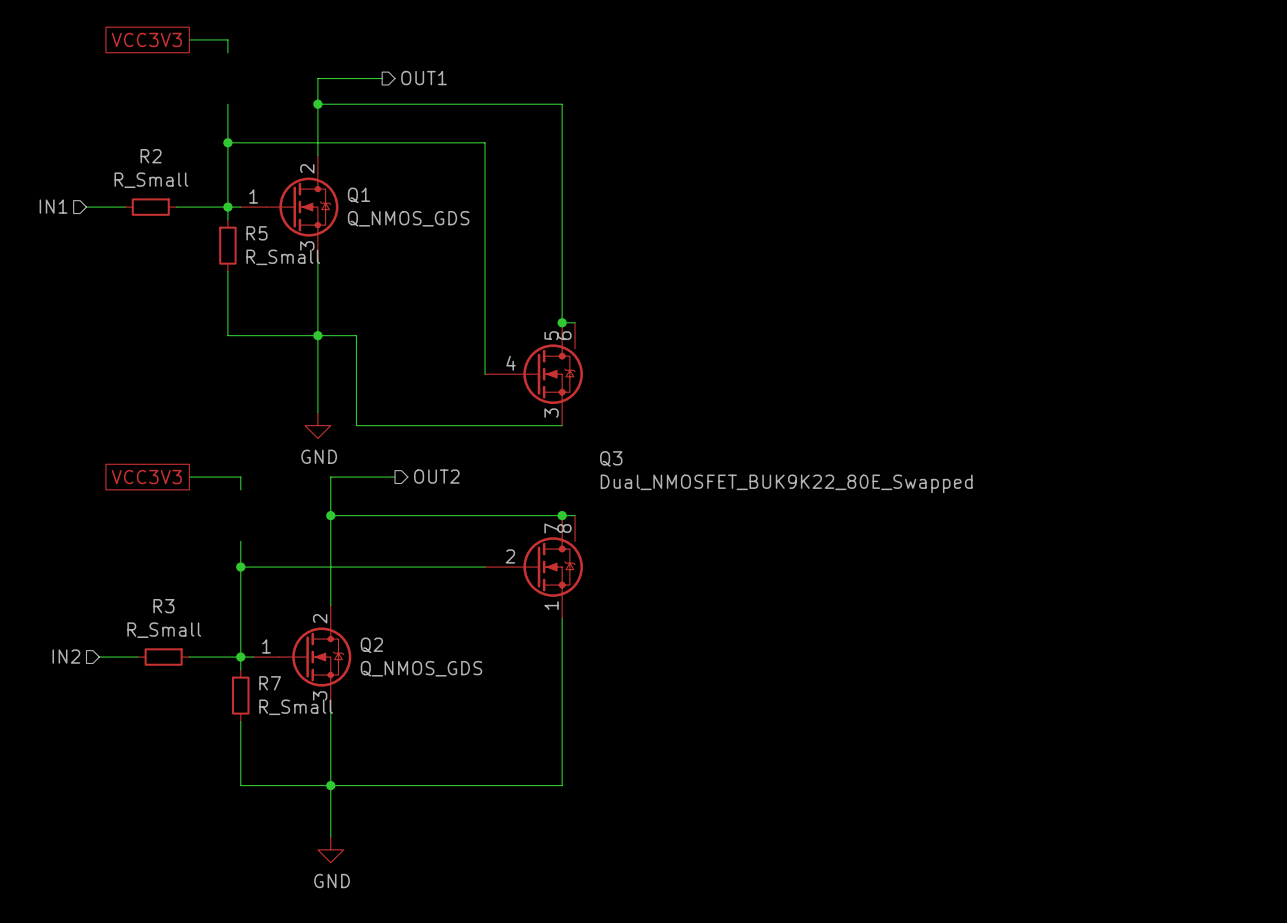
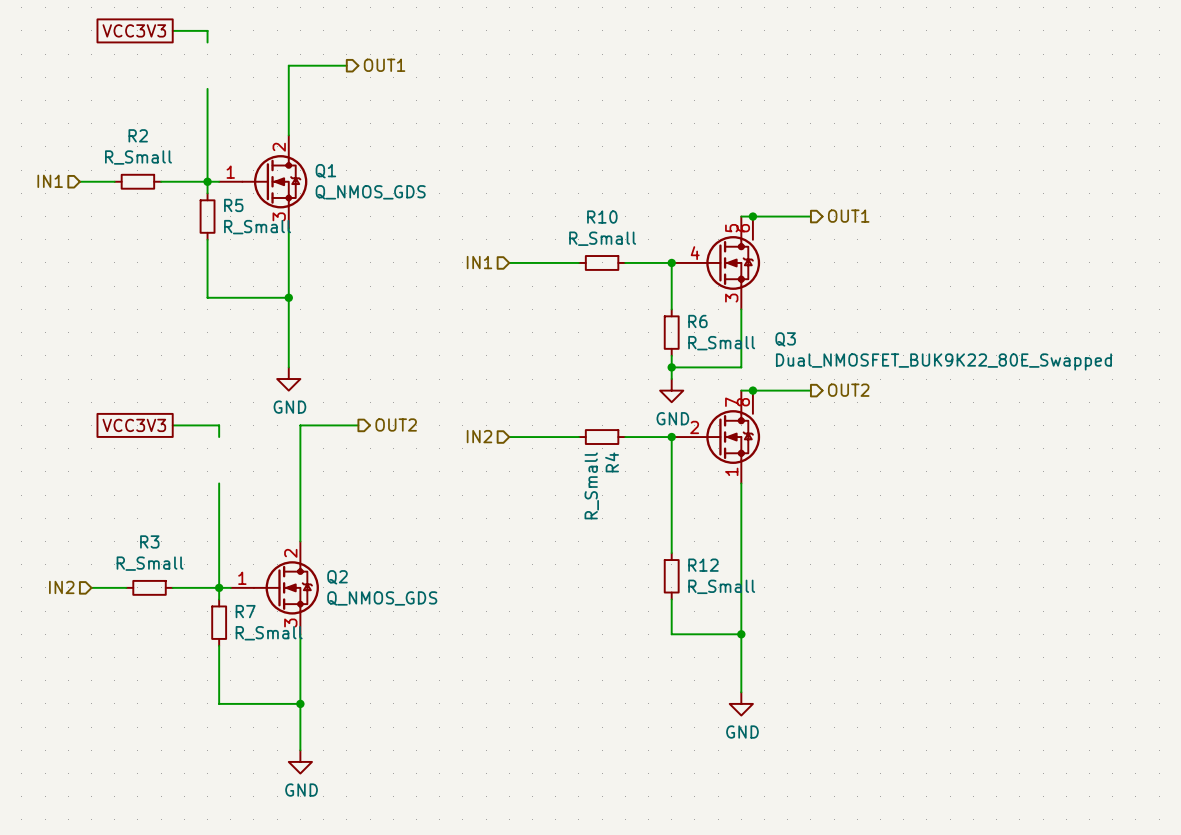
wire: (317, 104) (562, 104) (562, 322) (575, 322) -> none
junction: (317, 104) -> none
wire: (227, 142) (485, 142) (485, 374) -> none
junction: (227, 142) -> none
wire: none -> (741, 216) (810, 216)
junction: none -> (752, 216)
hierarchical label: none -> OUT1 (848, 216)
hierarchical label: none -> IN1 (479, 262)
wire: none -> (509, 262) (578, 262)
R10: none -> R_Small (602, 262)
wire: none -> (625, 262) (671, 262) (671, 309)
junction: none -> (671, 262)
junction: (562, 322) -> none
wire: (317, 335) (356, 335) (356, 425) (562, 425) -> none
wire: none -> (741, 309) (741, 367) (671, 367)
R6: none -> R_Small (671, 332)
wire: none -> (671, 355) (671, 379)
junction: none -> (671, 367)
power symbol: none -> GND (671, 390)
wire: none -> (741, 390) (810, 390)
junction: none -> (752, 390)
hierarchical label: none -> OUT2 (848, 390)
Q3 position: (534, 470) -> (715, 350)
hierarchical label: none -> IN2 (479, 436)
wire: none -> (509, 437) (578, 437)
R4: none -> R_Small (602, 437)
wire: none -> (625, 437) (671, 437) (671, 553)
junction: none -> (671, 437)
wire: (330, 515) (575, 515) -> none
junction: (330, 515) -> none
junction: (562, 515) -> none
wire: none -> (741, 483) (741, 692)
wire: (240, 567) (485, 567) -> none
junction: (240, 567) -> none
wire: (562, 618) (562, 785) (330, 785) -> none
R12: none -> R_Small (671, 576)
wire: none -> (671, 599) (671, 634) (741, 634)
junction: none -> (741, 634)
power symbol: none -> GND (741, 703)

